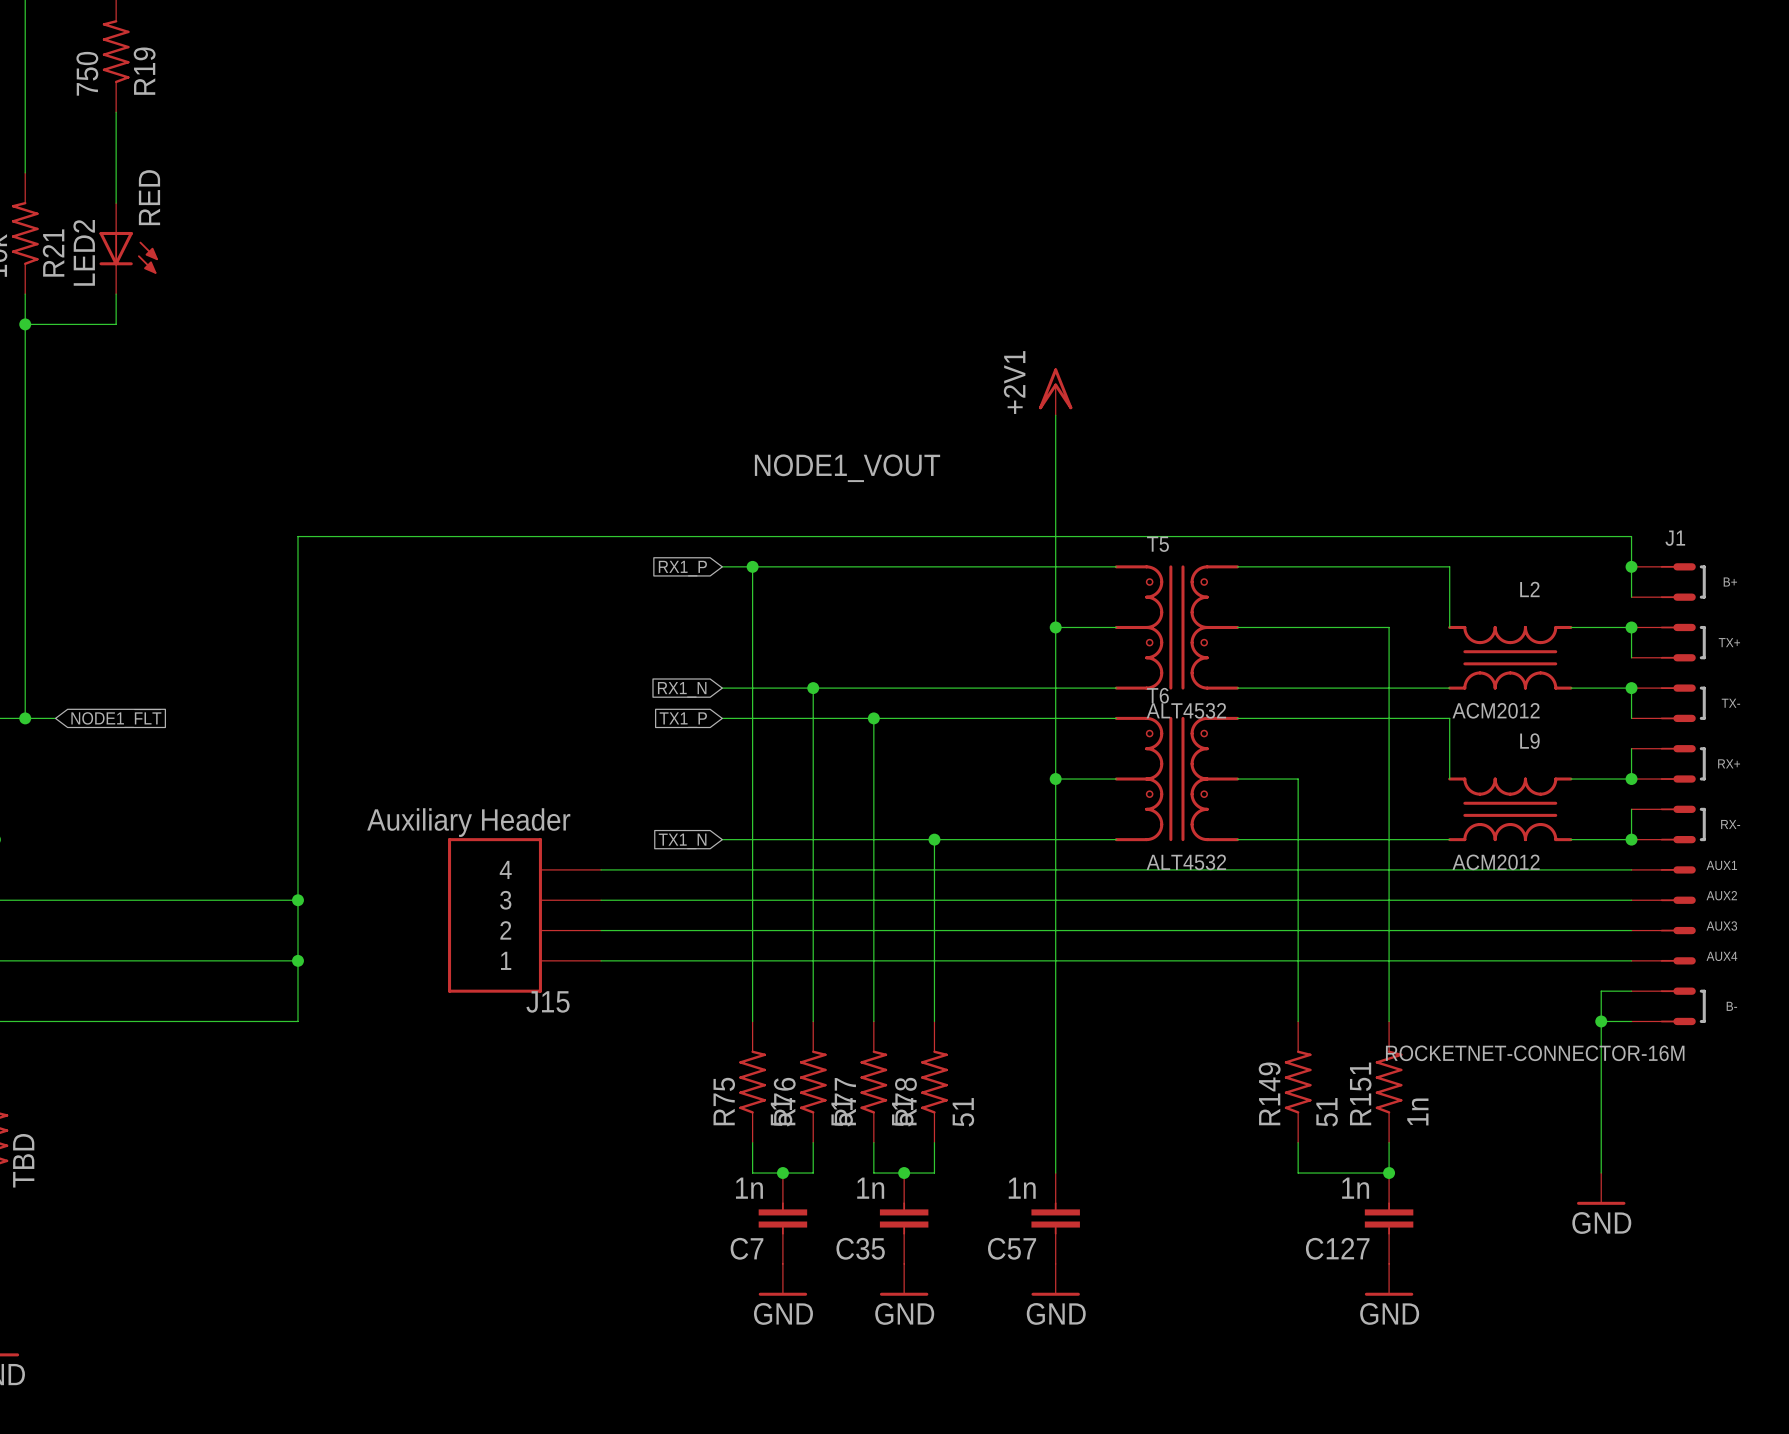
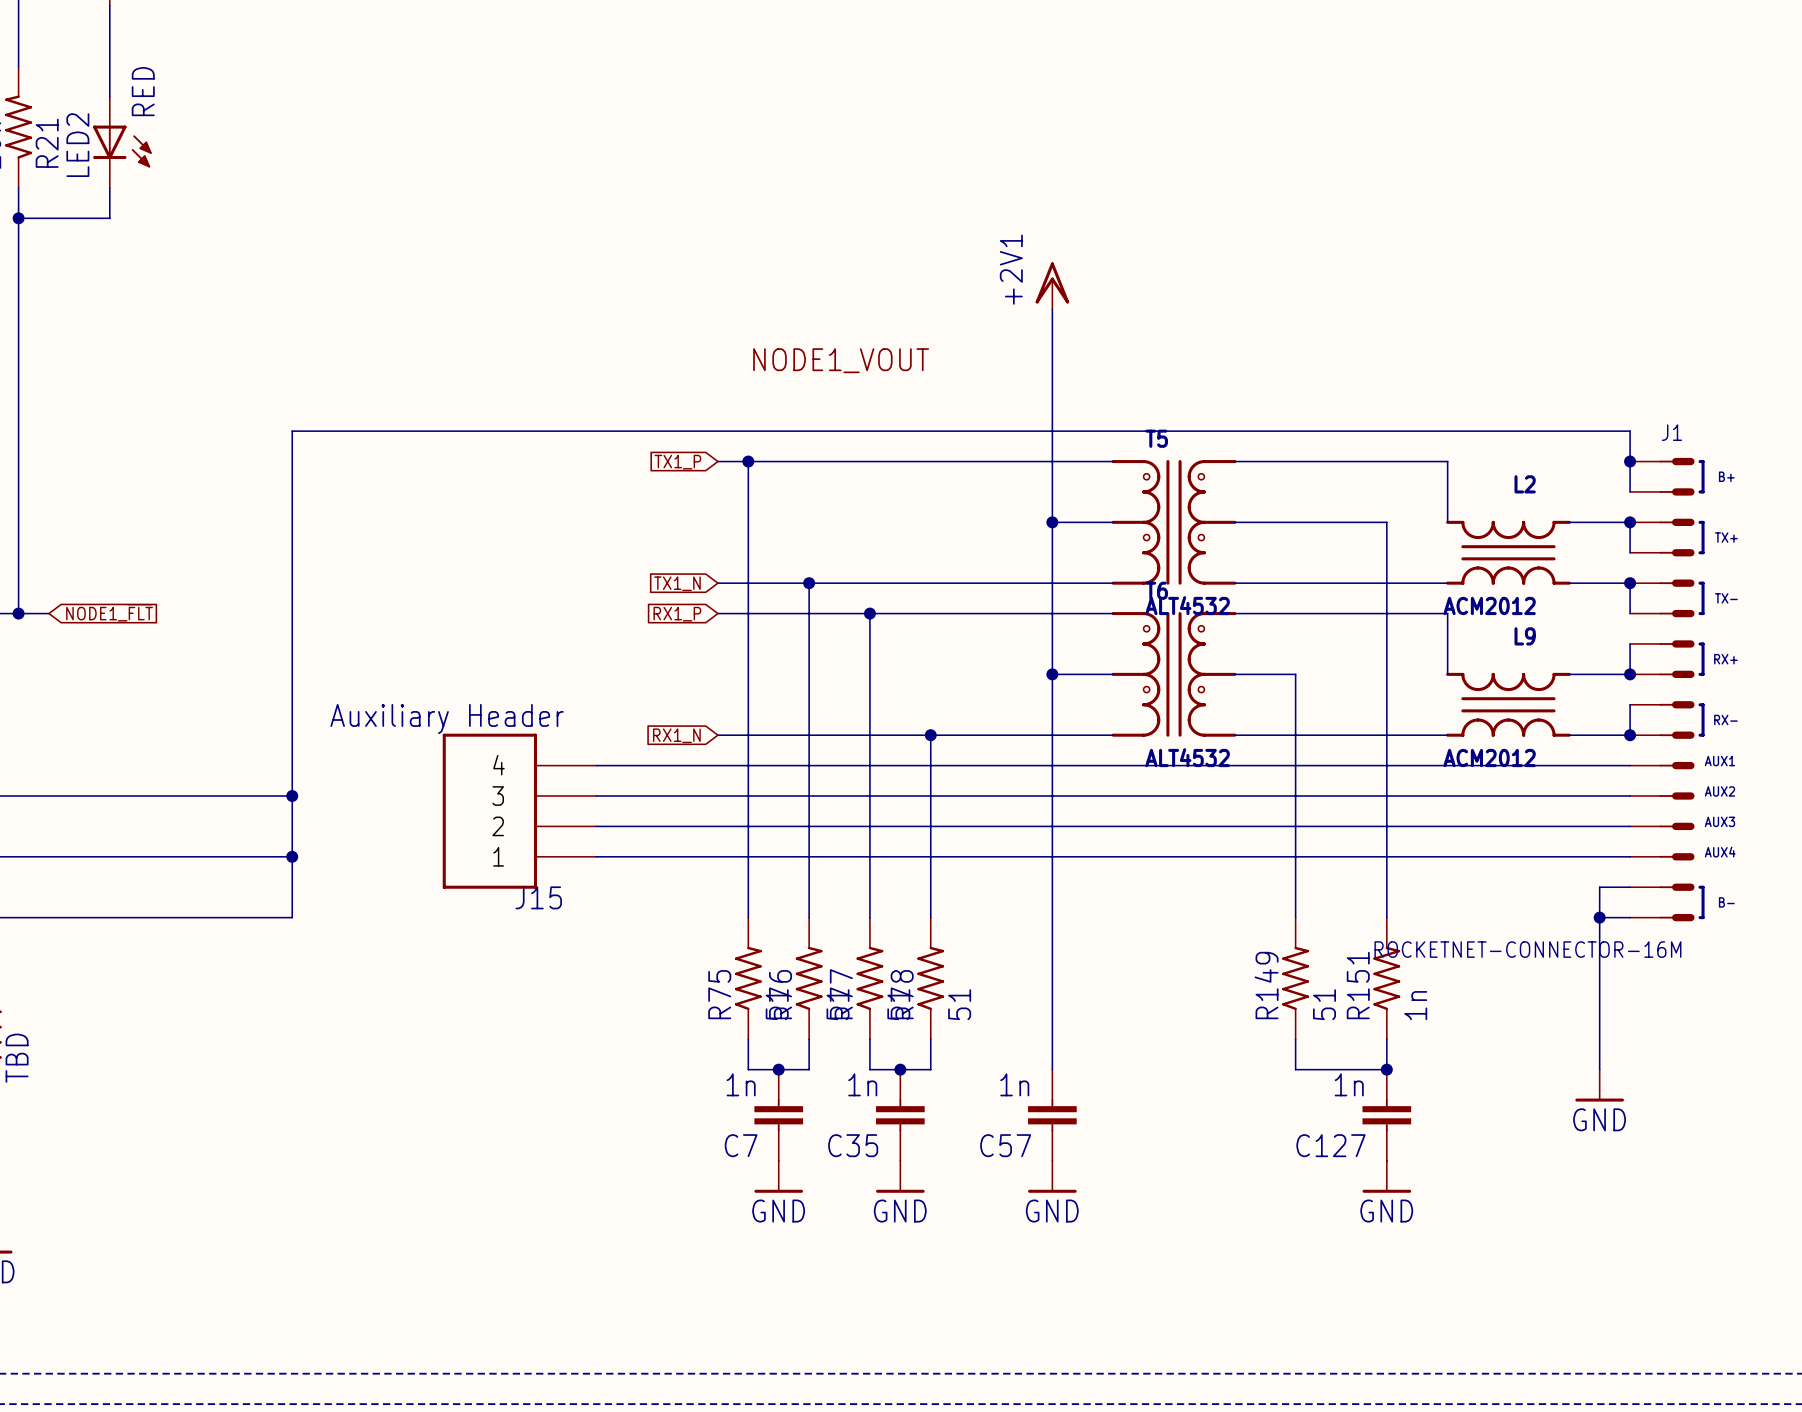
global label: RX1_P (682, 568) -> TX1_P (677, 462)
global label: RX1_N (682, 689) -> TX1_N (677, 583)
global label: TX1_P (683, 720) -> RX1_P (677, 614)
global label: TX1_N (682, 841) -> RX1_N (676, 735)

